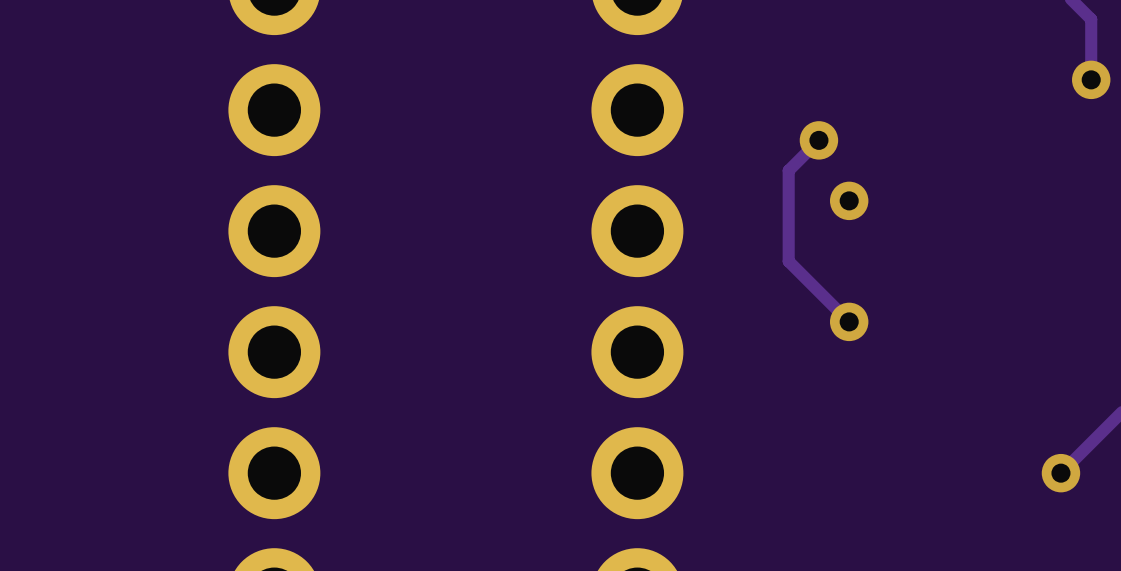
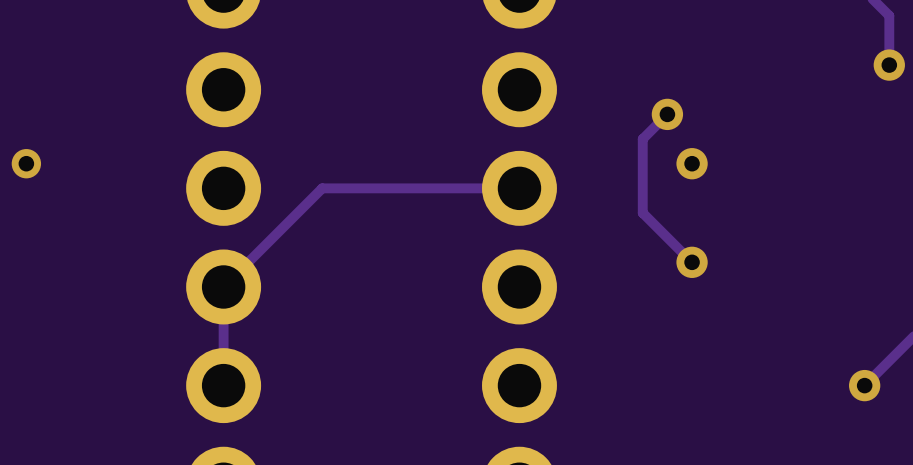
via: none -> (26, 163)
track: none -> (519, 188) (322, 188) (223, 286) (223, 385)

